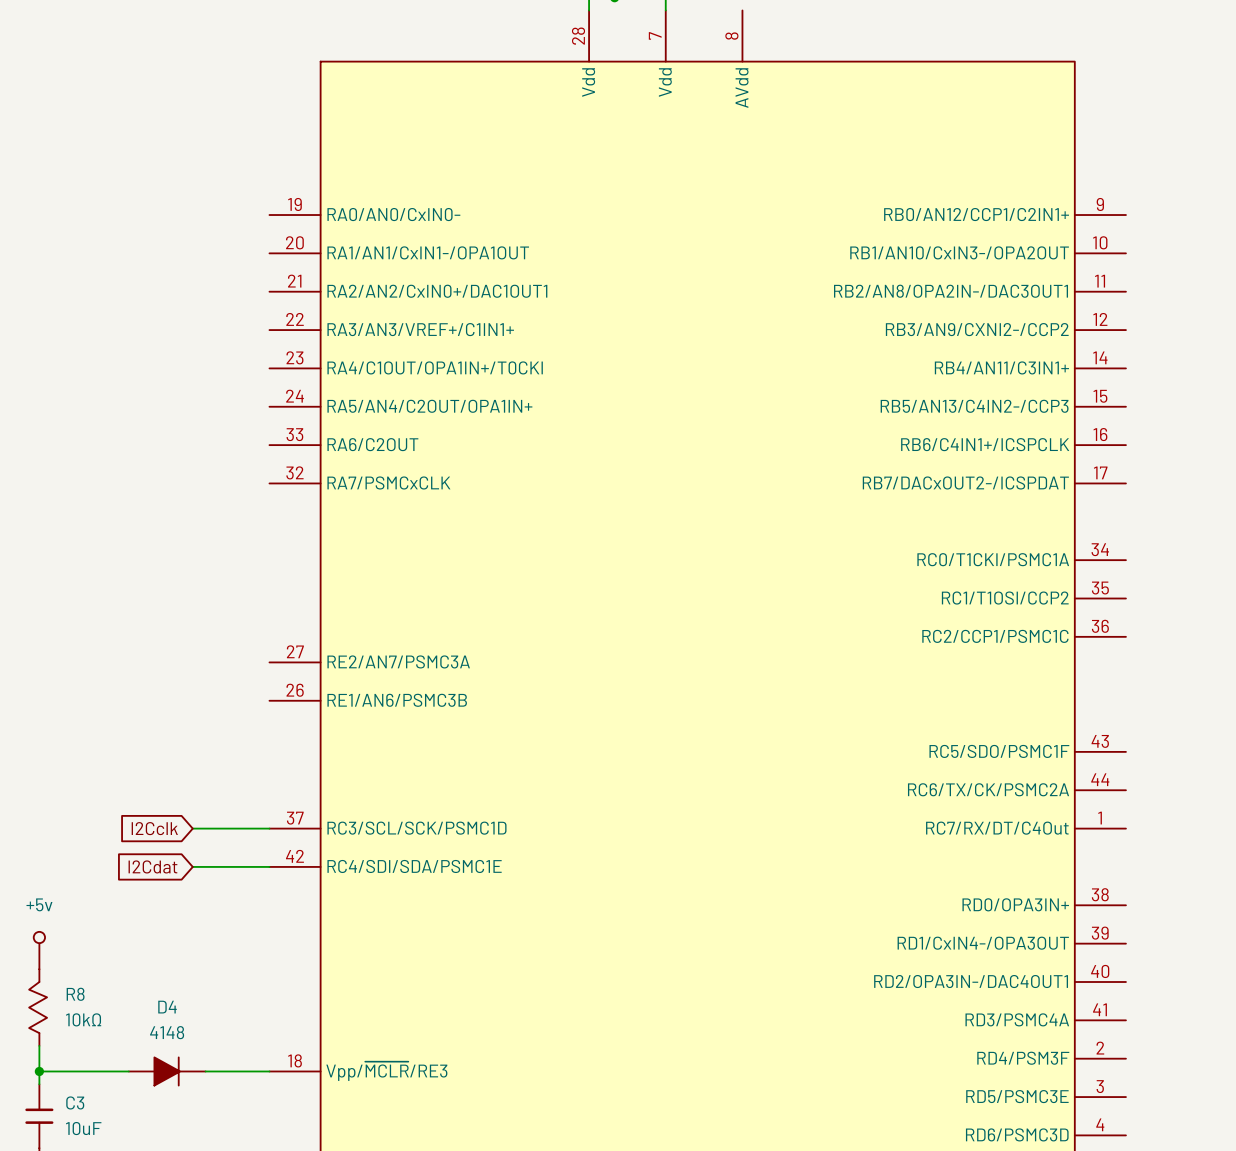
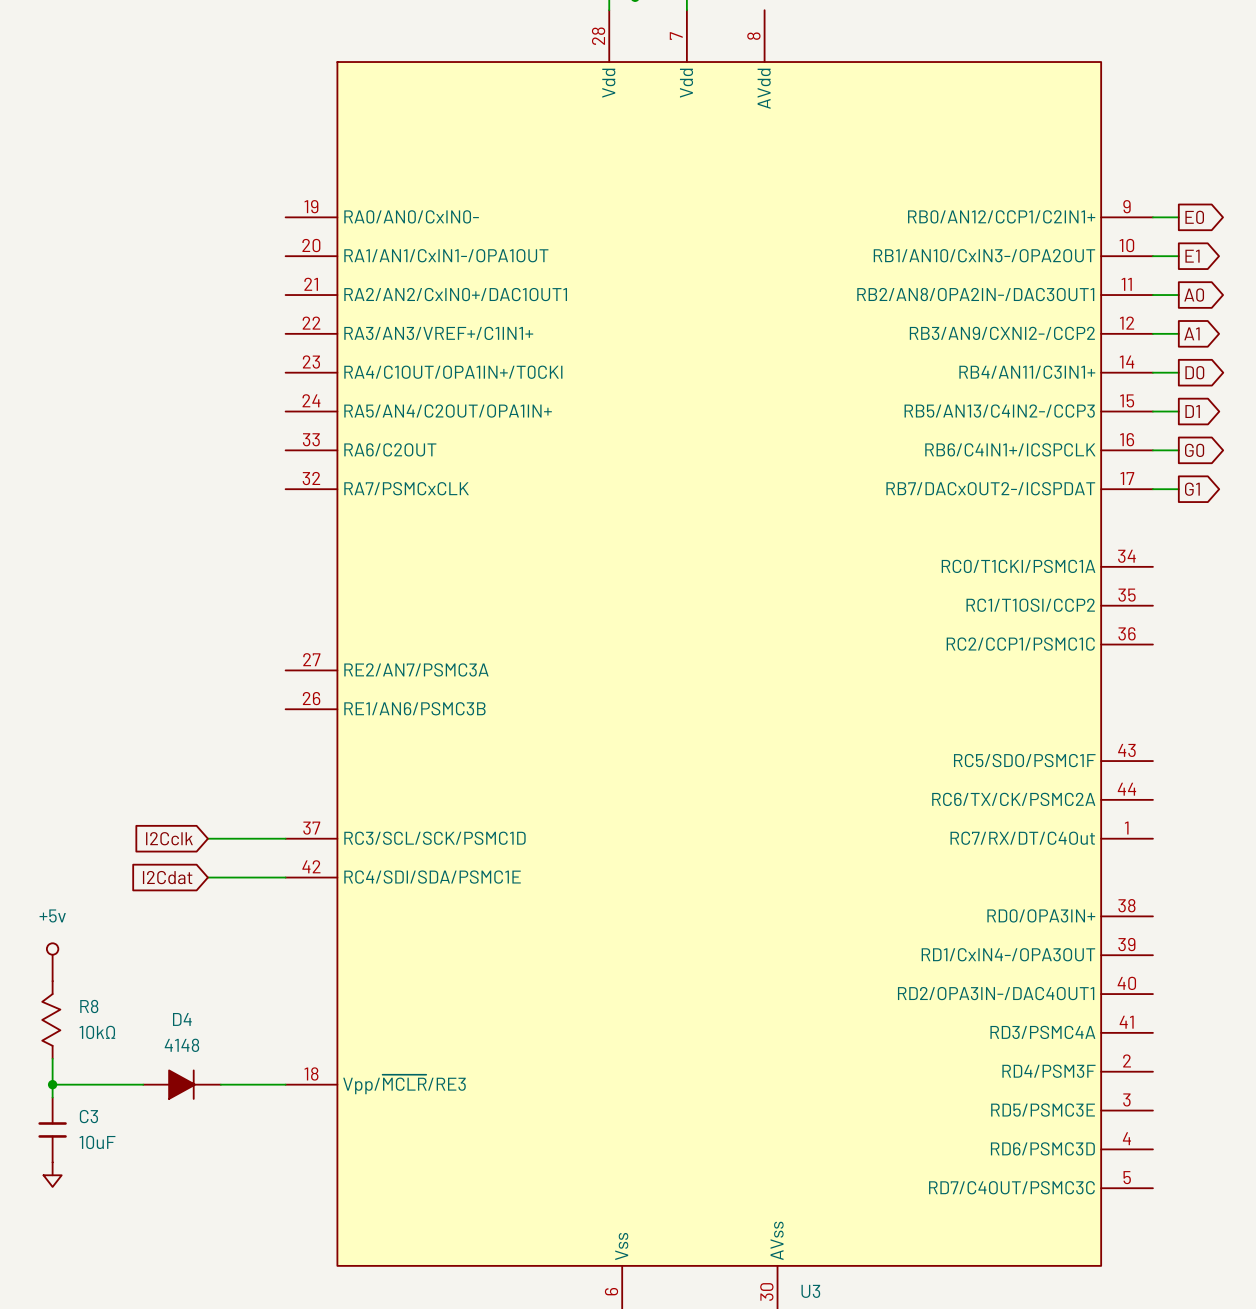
wire: none -> (1152, 217) (1178, 217)
global label: none -> E0 (1194, 217)
wire: none -> (1152, 256) (1178, 256)
global label: none -> E1 (1192, 256)
wire: none -> (1152, 295) (1178, 295)
global label: none -> A0 (1194, 295)
wire: none -> (1152, 333) (1178, 333)
global label: none -> A1 (1191, 333)
wire: none -> (1152, 372) (1178, 372)
global label: none -> D0 (1194, 372)
wire: none -> (1152, 411) (1178, 411)
global label: none -> D1 (1192, 411)
wire: none -> (1152, 450) (1178, 450)
global label: none -> G0 (1194, 450)
wire: none -> (1152, 489) (1178, 489)
global label: none -> G1 (1192, 489)

